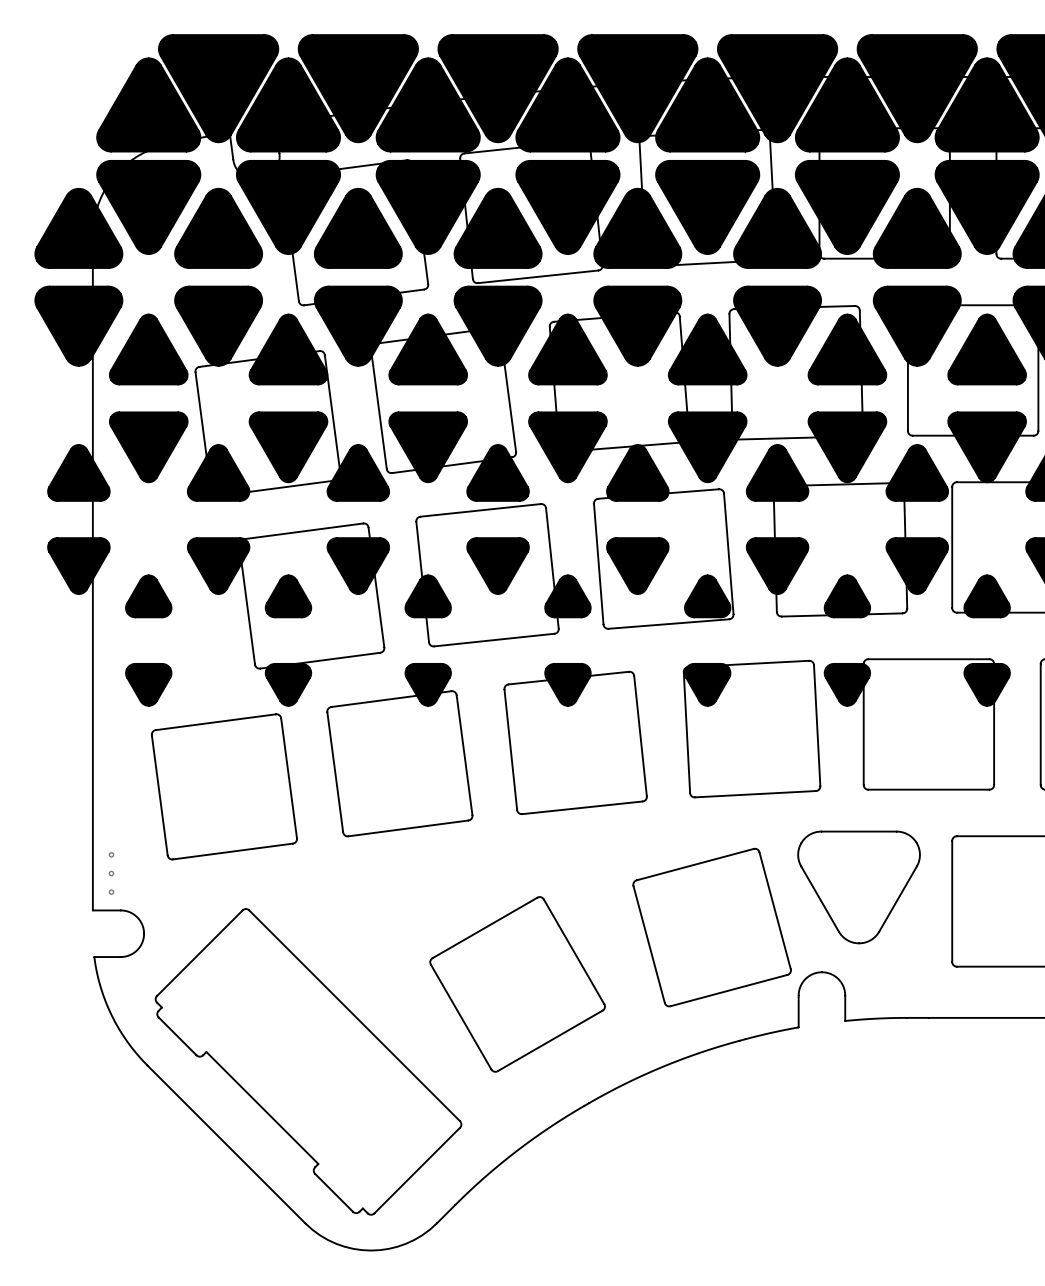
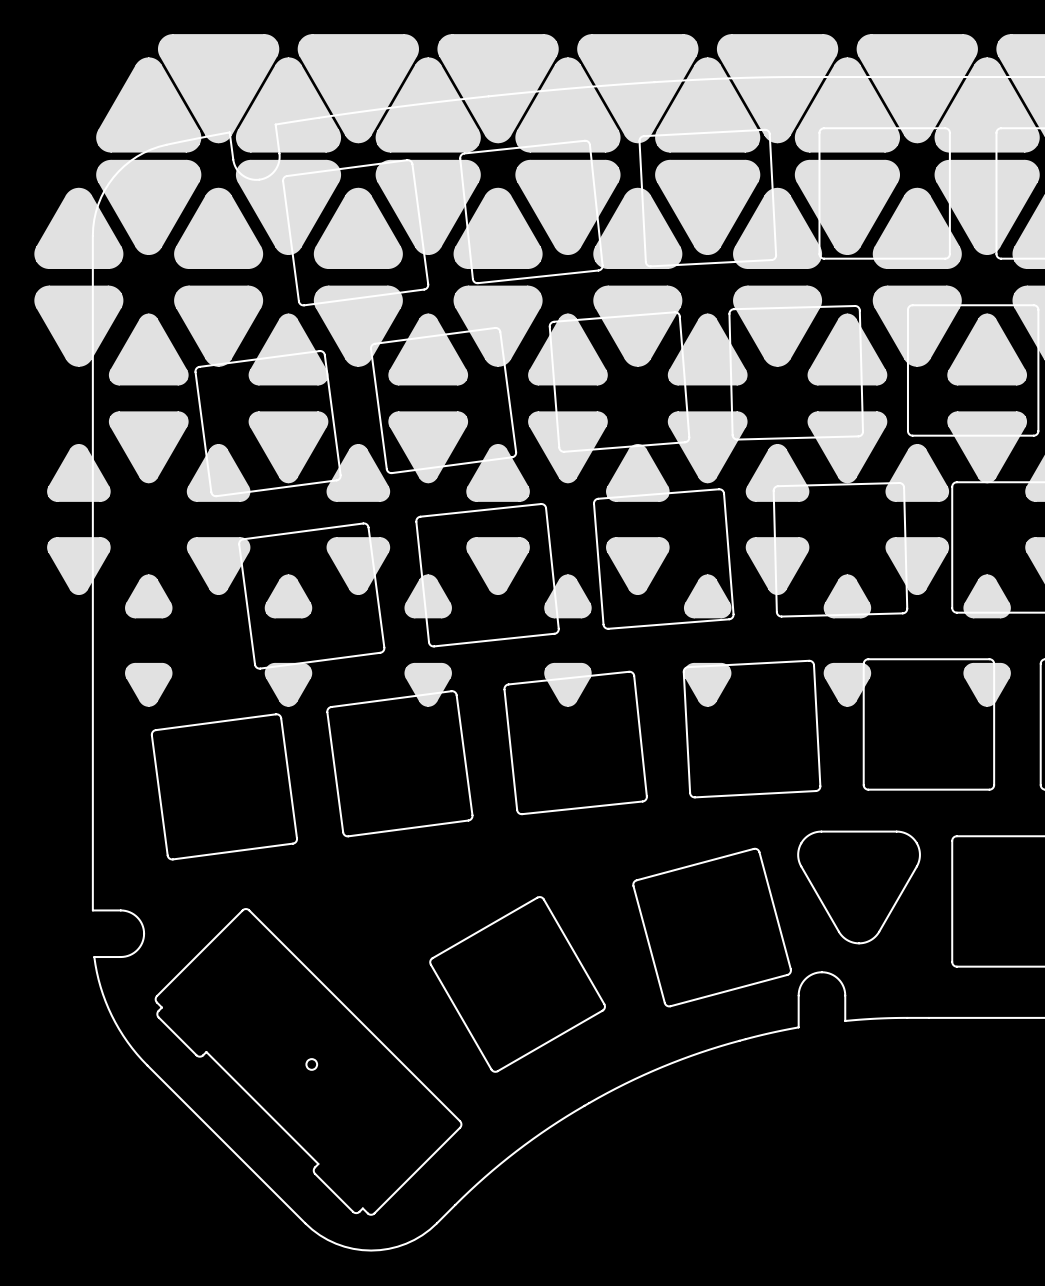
via: (111, 854) -> none
via: (111, 873) -> none
via: (111, 892) -> none
part: none -> (311, 1064)

